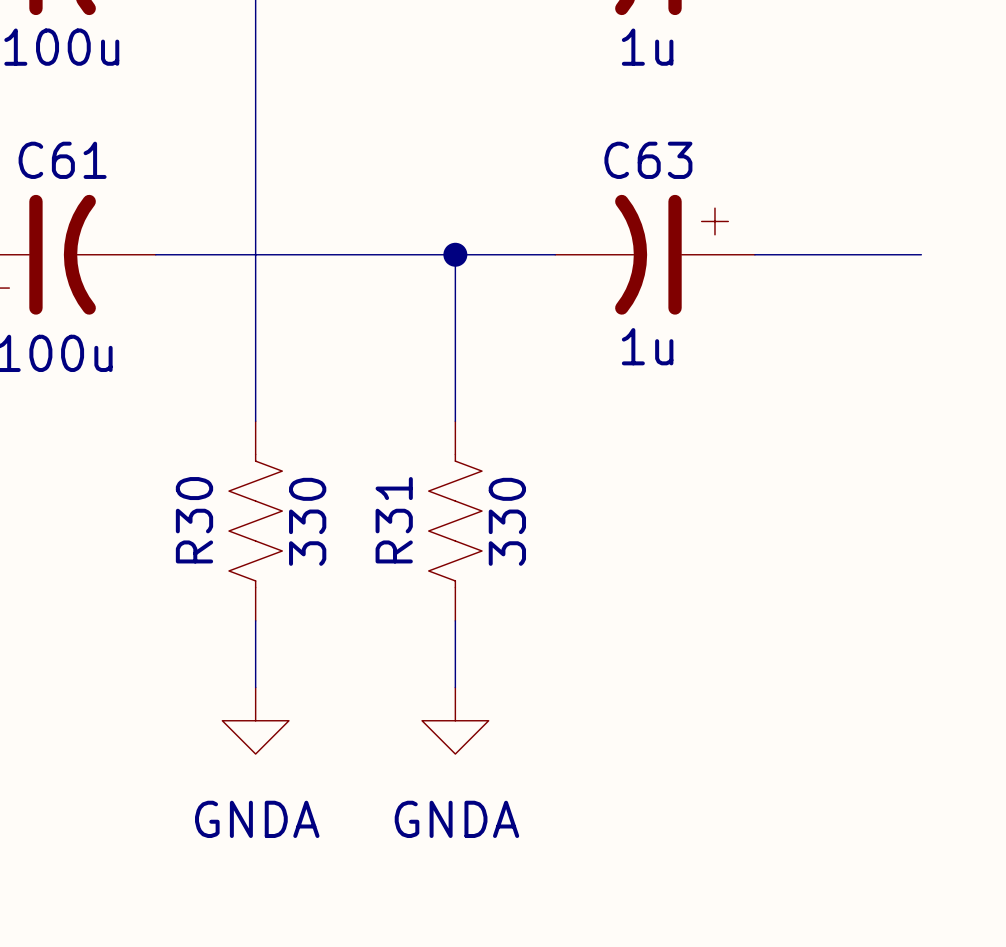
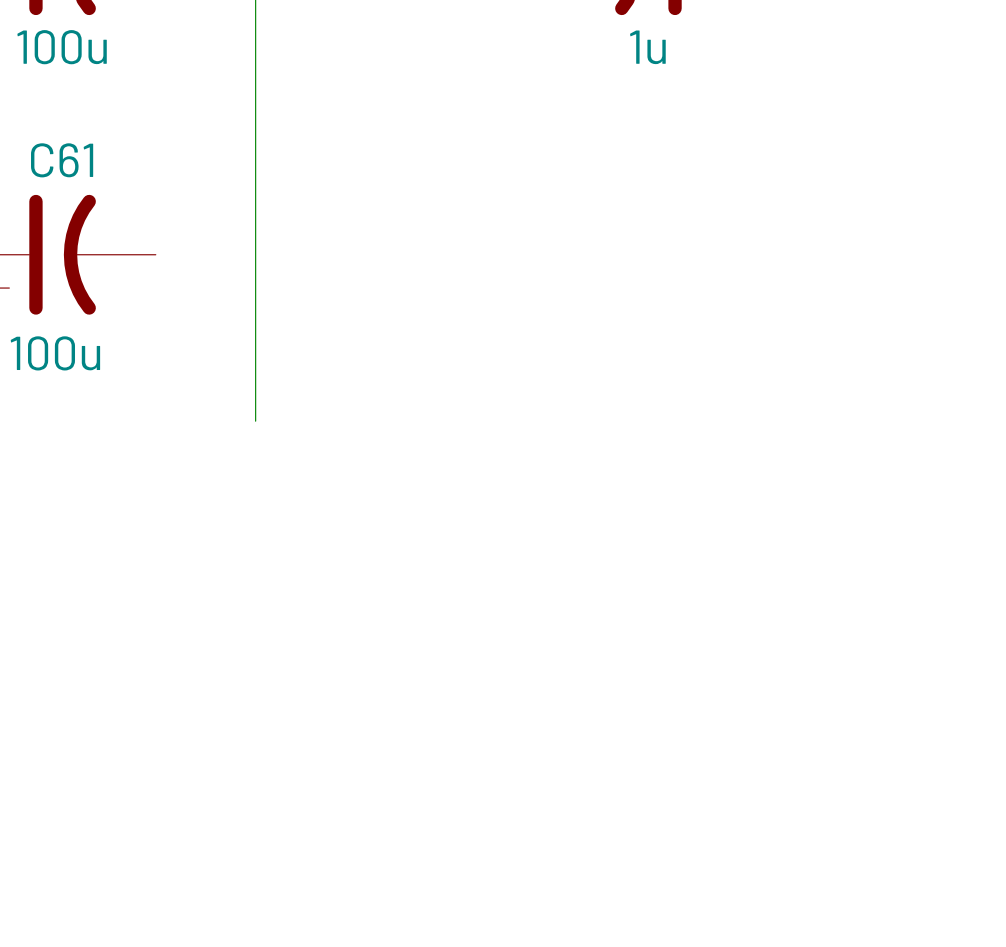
wire: (155, 254) (555, 254) -> none
wire: (455, 254) (455, 421) -> none
junction: (455, 254) -> none
C63: 1u (655, 254) -> none
wire: (754, 254) (921, 254) -> none
R30: 330 (255, 521) -> none
R31: 330 (455, 521) -> none
wire: (255, 620) (255, 687) -> none
wire: (455, 620) (455, 687) -> none
power symbol: GNDA (255, 720) -> none
power symbol: GNDA (455, 720) -> none

